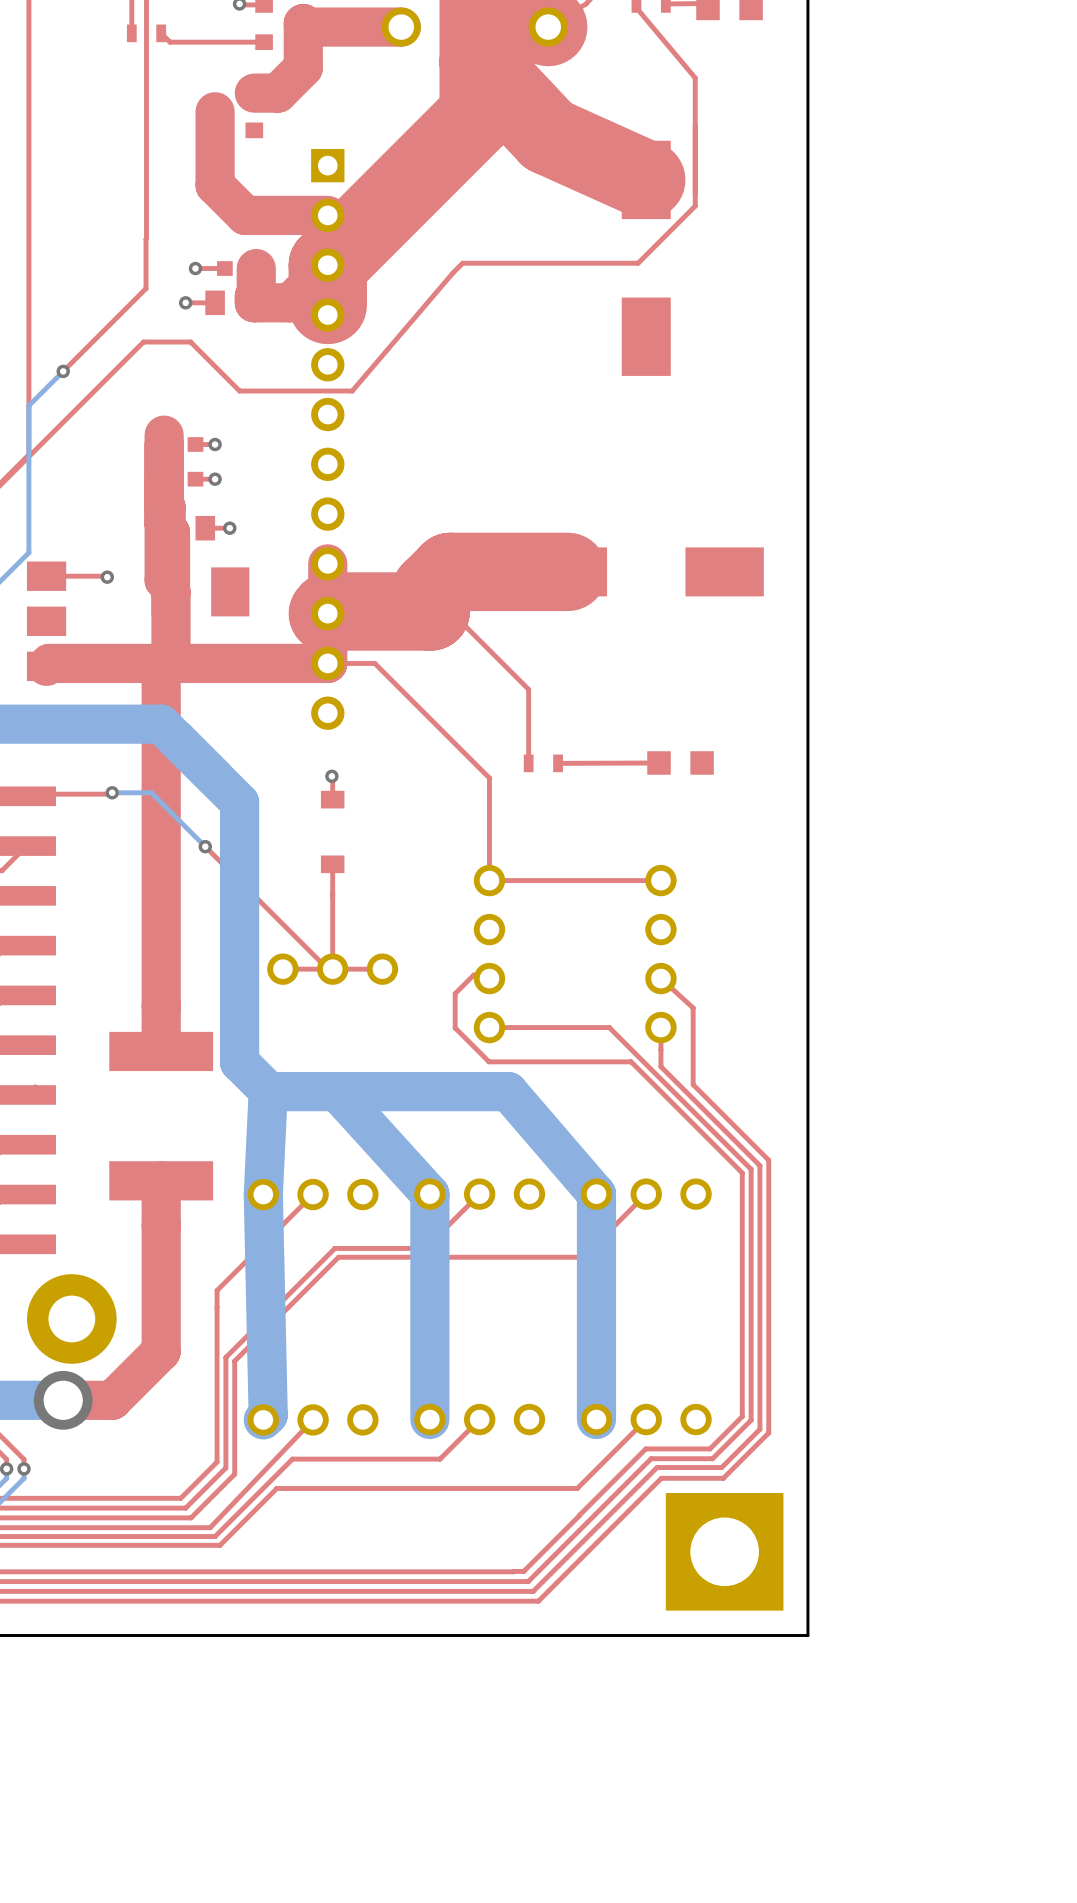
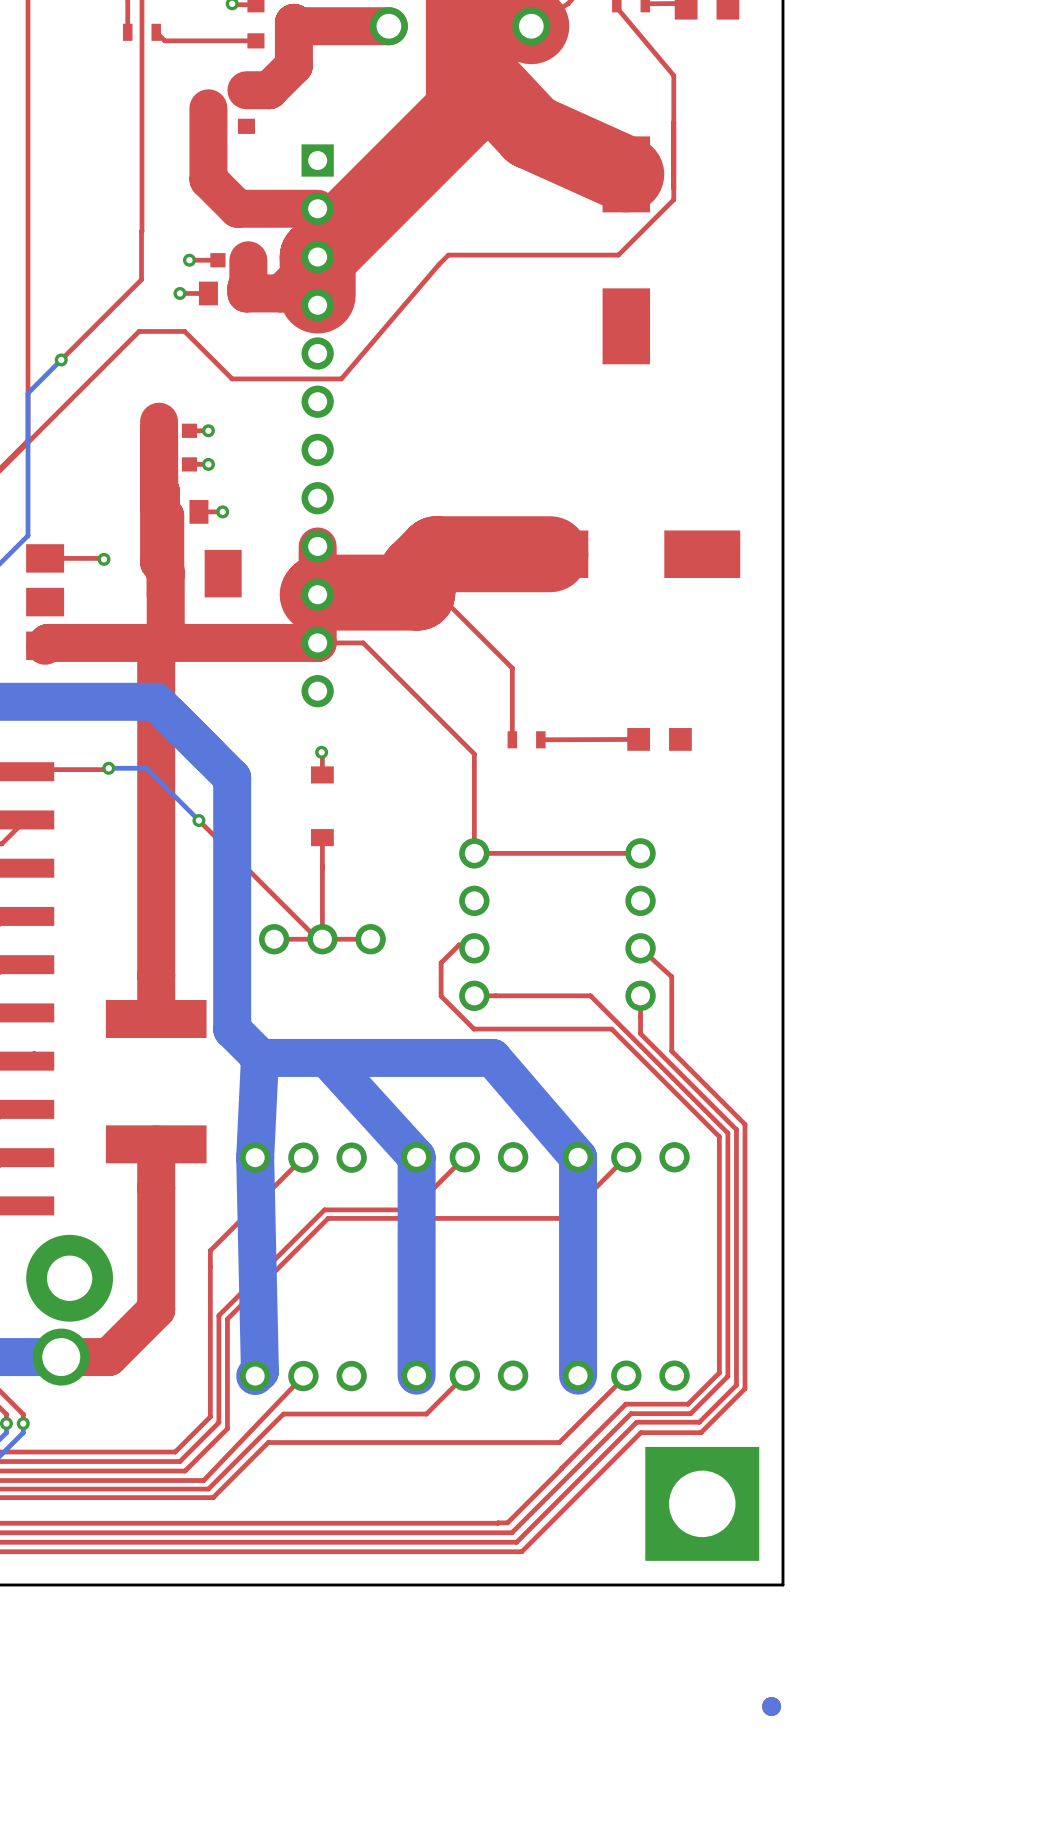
part: none -> (771, 1706)

